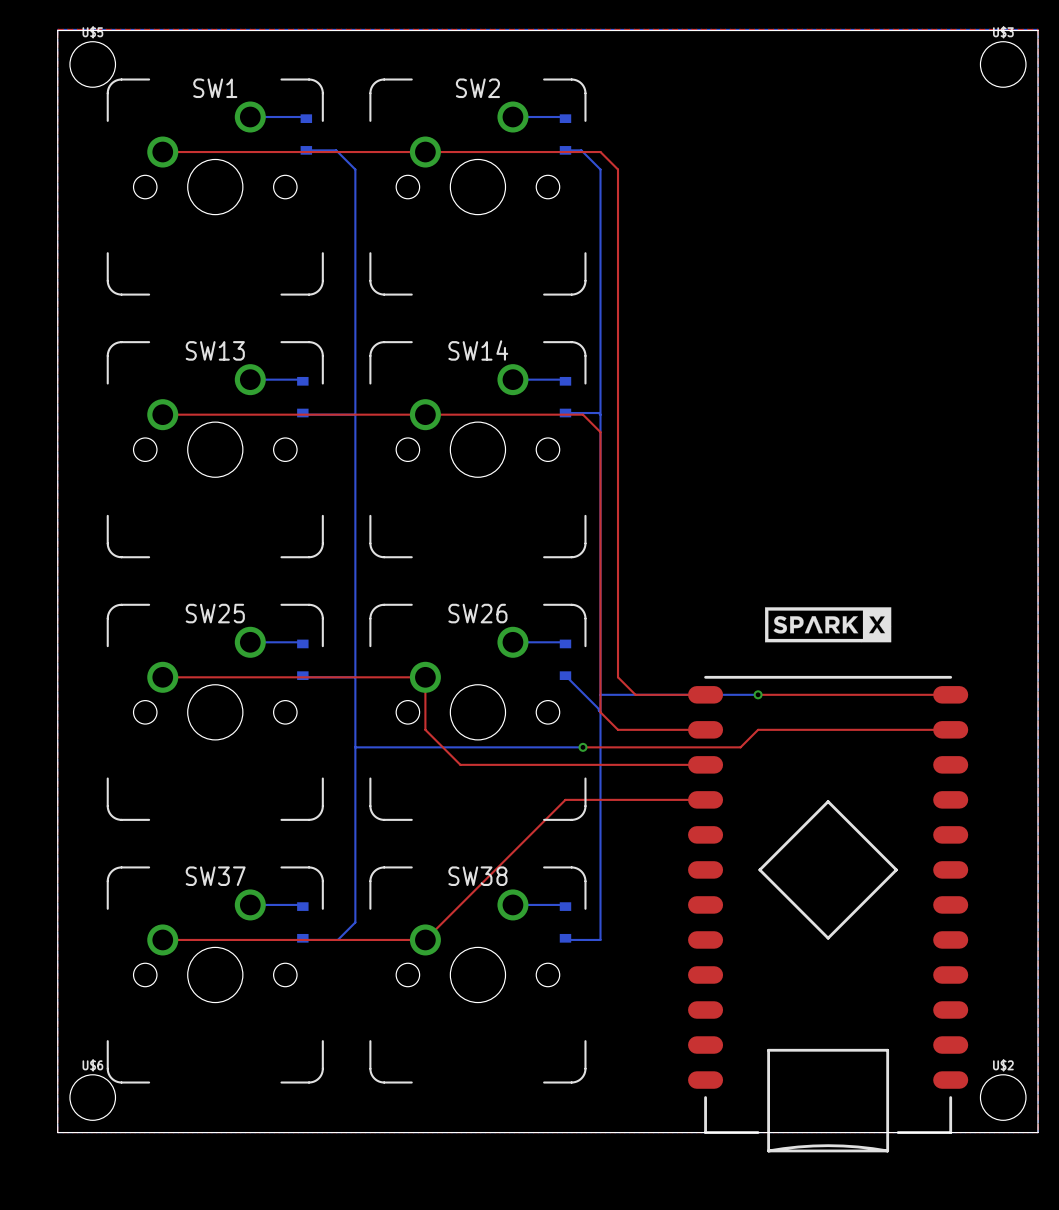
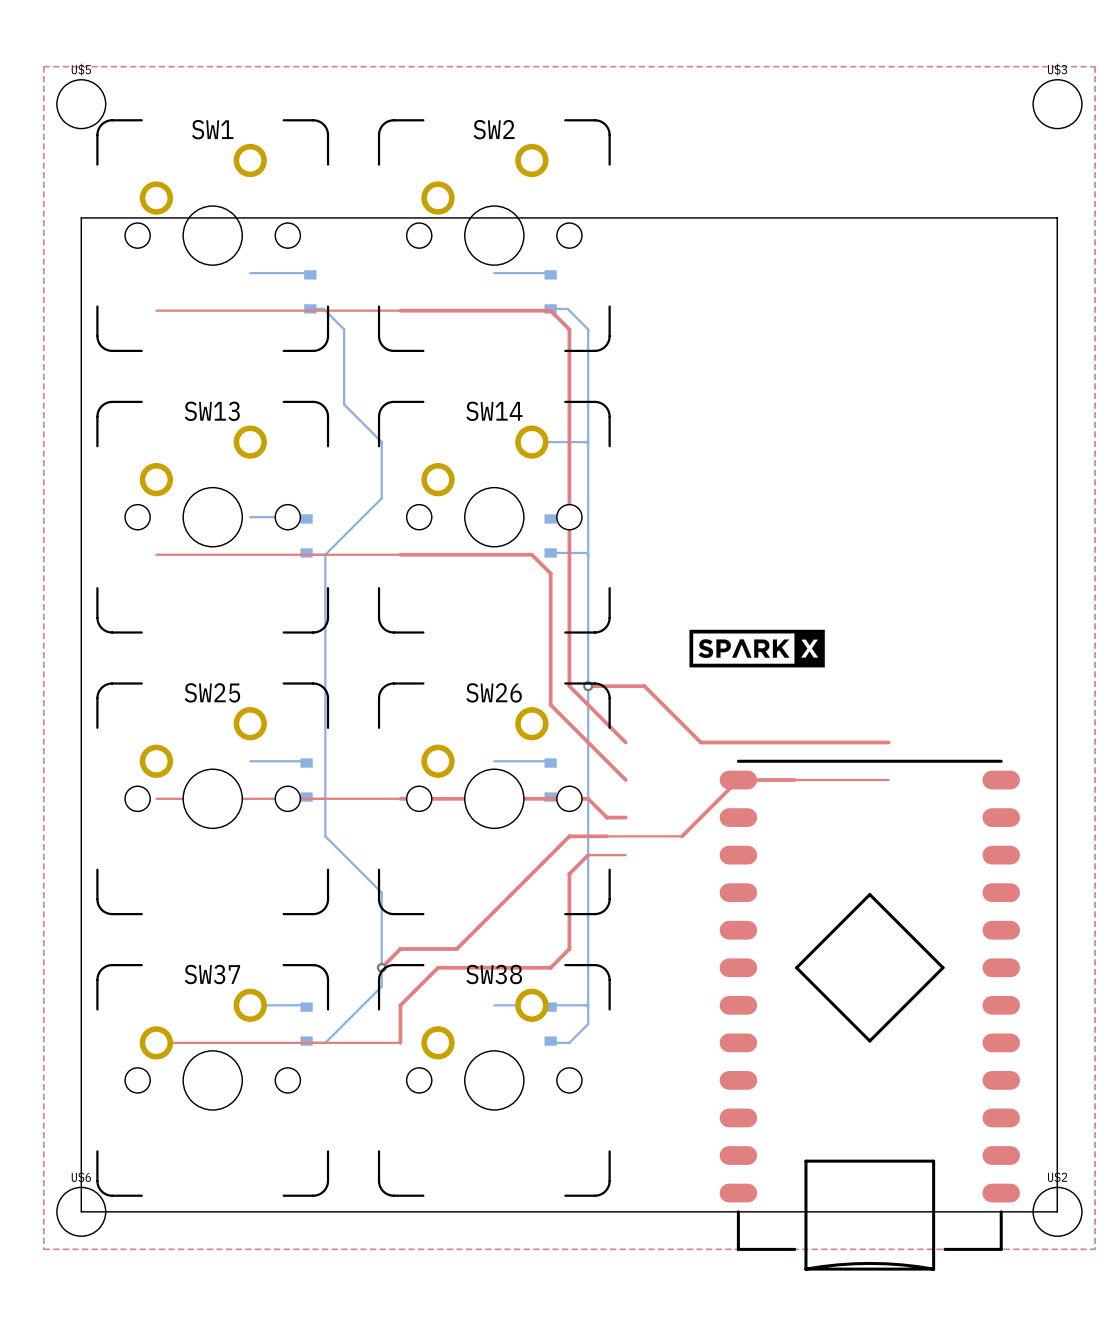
board edge: (57, 30) (1037, 30) (1037, 1132) (57, 1132) (57, 30) -> (81, 217) (81, 1211) (1057, 1211) (1057, 217) (81, 217)
bottom track: (250, 117) (304, 117) (306, 118) -> (250, 273) (308, 273) (310, 274)
bottom track: (512, 117) (563, 117) (565, 118) -> (494, 273) (548, 273) (550, 274)
part: (306, 134) -> none
part: (565, 134) -> none
bottom track: (306, 150) (336, 150) (355, 169) (355, 922) (337, 939) (320, 939) -> (325, 554) (325, 836) (381, 892) (381, 986) (325, 1042)
bottom track: (565, 150) (581, 150) (600, 169) (600, 939) (567, 939) (565, 938) -> none
top track: (162, 152) (600, 152) (618, 169) (618, 677) (635, 694) (705, 694) -> none
part: none -> (310, 291)
part: none -> (550, 291)
bottom track: none -> (310, 308) (323, 308) (344, 329) (344, 404) (381, 442) (381, 498) (325, 554)
bottom track: none -> (550, 308) (567, 308) (588, 329) (588, 1024) (569, 1042) (552, 1042) (550, 1041)
top track: none -> (156, 310) (550, 310) (569, 329) (569, 686) (625, 742)
bottom track: (250, 379) (301, 379) (302, 381) -> (250, 517) (304, 517) (306, 518)
part position: (302, 397) -> (306, 535)
part position: (565, 397) -> (550, 535)
bottom track: (302, 413) (304, 414) (355, 414) -> none
bottom track: (565, 413) (598, 413) (600, 414) -> (550, 552) (586, 552) (588, 554)
top track: (162, 414) (582, 414) (600, 432) (600, 712) (618, 729) (705, 729) -> none
top track: none -> (156, 554) (531, 554) (550, 573) (550, 704) (625, 780)
top track: none -> (588, 686) (644, 686) (700, 742) (888, 742)
via: none -> (588, 686)
drawing position: (828, 624) -> (757, 648)
bottom track: (250, 642) (301, 642) (302, 643) -> (250, 761) (304, 761) (306, 763)
bottom track: (512, 642) (563, 642) (565, 643) -> (494, 761) (548, 761) (550, 763)
part position: (302, 659) -> (306, 780)
part position: (565, 659) -> (550, 780)
bottom track: (302, 675) (304, 677) (355, 677) -> none
bottom track: (565, 675) (600, 712) -> none
top track: (162, 677) (425, 677) (425, 729) (460, 764) (565, 764) -> none
bottom track: (600, 694) (758, 694) -> none
via: (758, 694) -> none
top track: (845, 694) (950, 694) -> none
top track: none -> (156, 798) (588, 798) (606, 817) (625, 817)
top track: (950, 729) (758, 729) (740, 747) (653, 747) -> (794, 780) (738, 780) (682, 836)
bottom track: (355, 747) (582, 747) -> none
top track: none -> (606, 836) (569, 836) (456, 949) (400, 949) (381, 967)
via: (582, 747) -> none
top track: (600, 764) (705, 764) -> none
top track: (705, 799) (565, 799) (425, 939) (390, 939) -> (588, 855) (569, 873) (569, 949) (550, 967) (438, 967) (400, 1005) (400, 1042)
via: none -> (381, 967)
bottom track: none -> (494, 1005) (531, 1005)
part position: (565, 922) -> (550, 1024)

